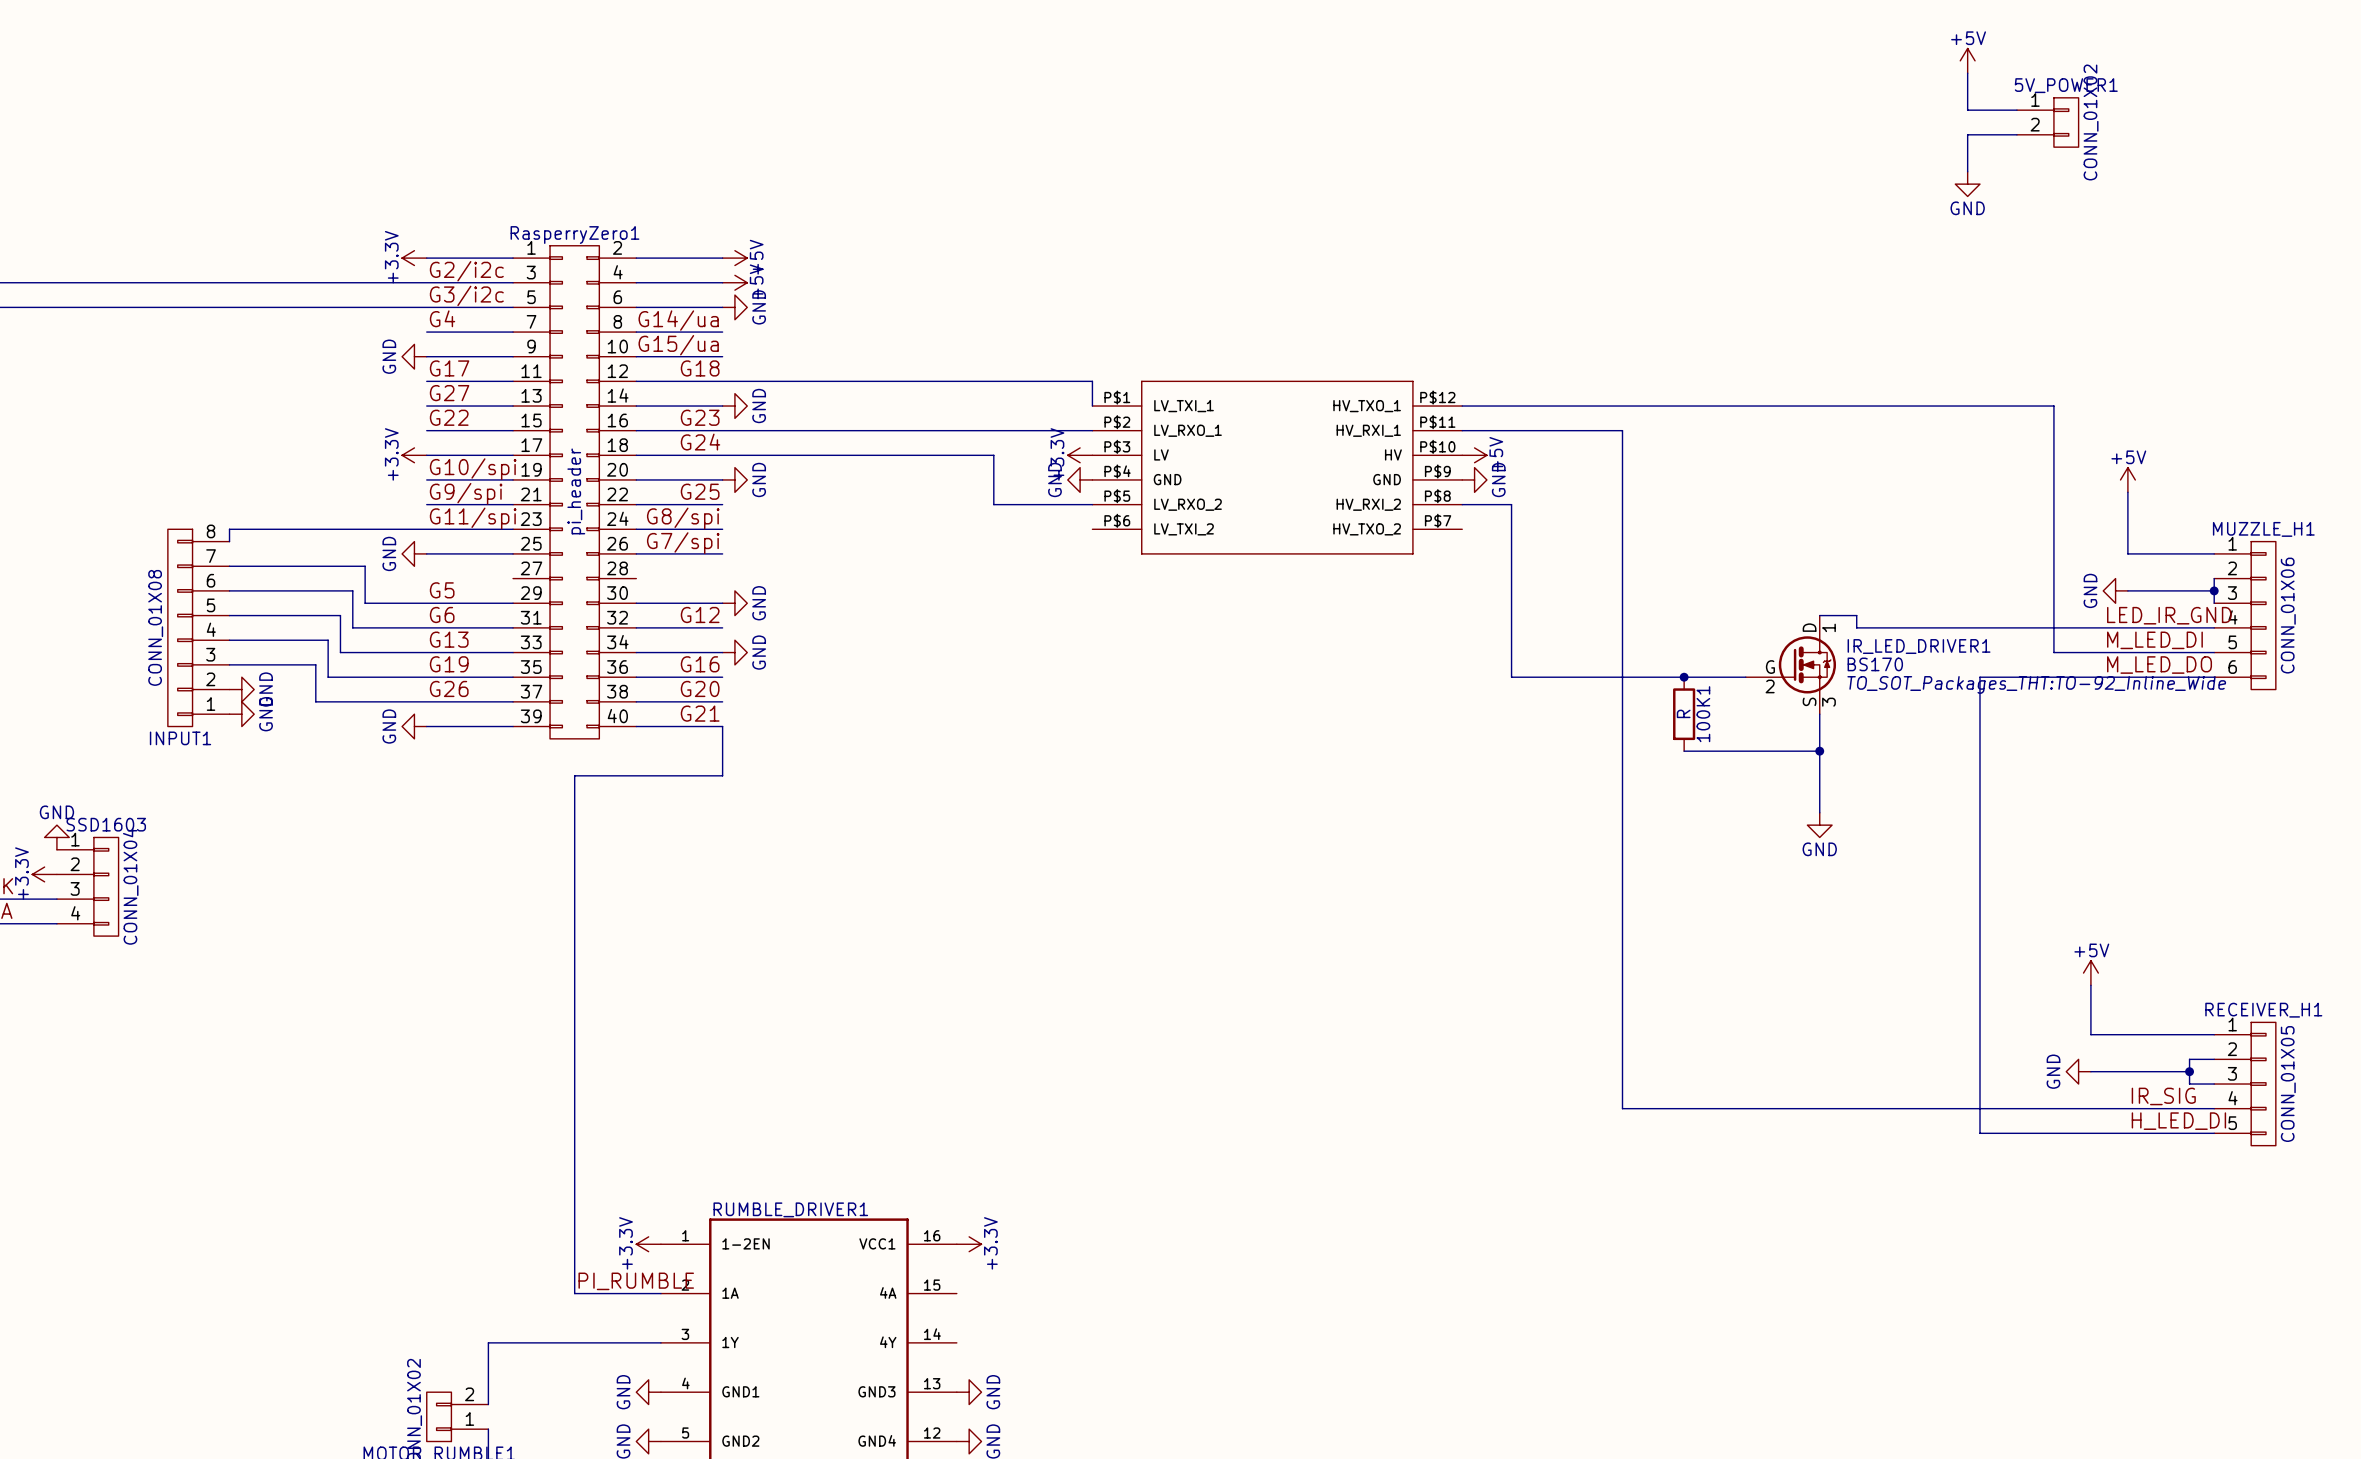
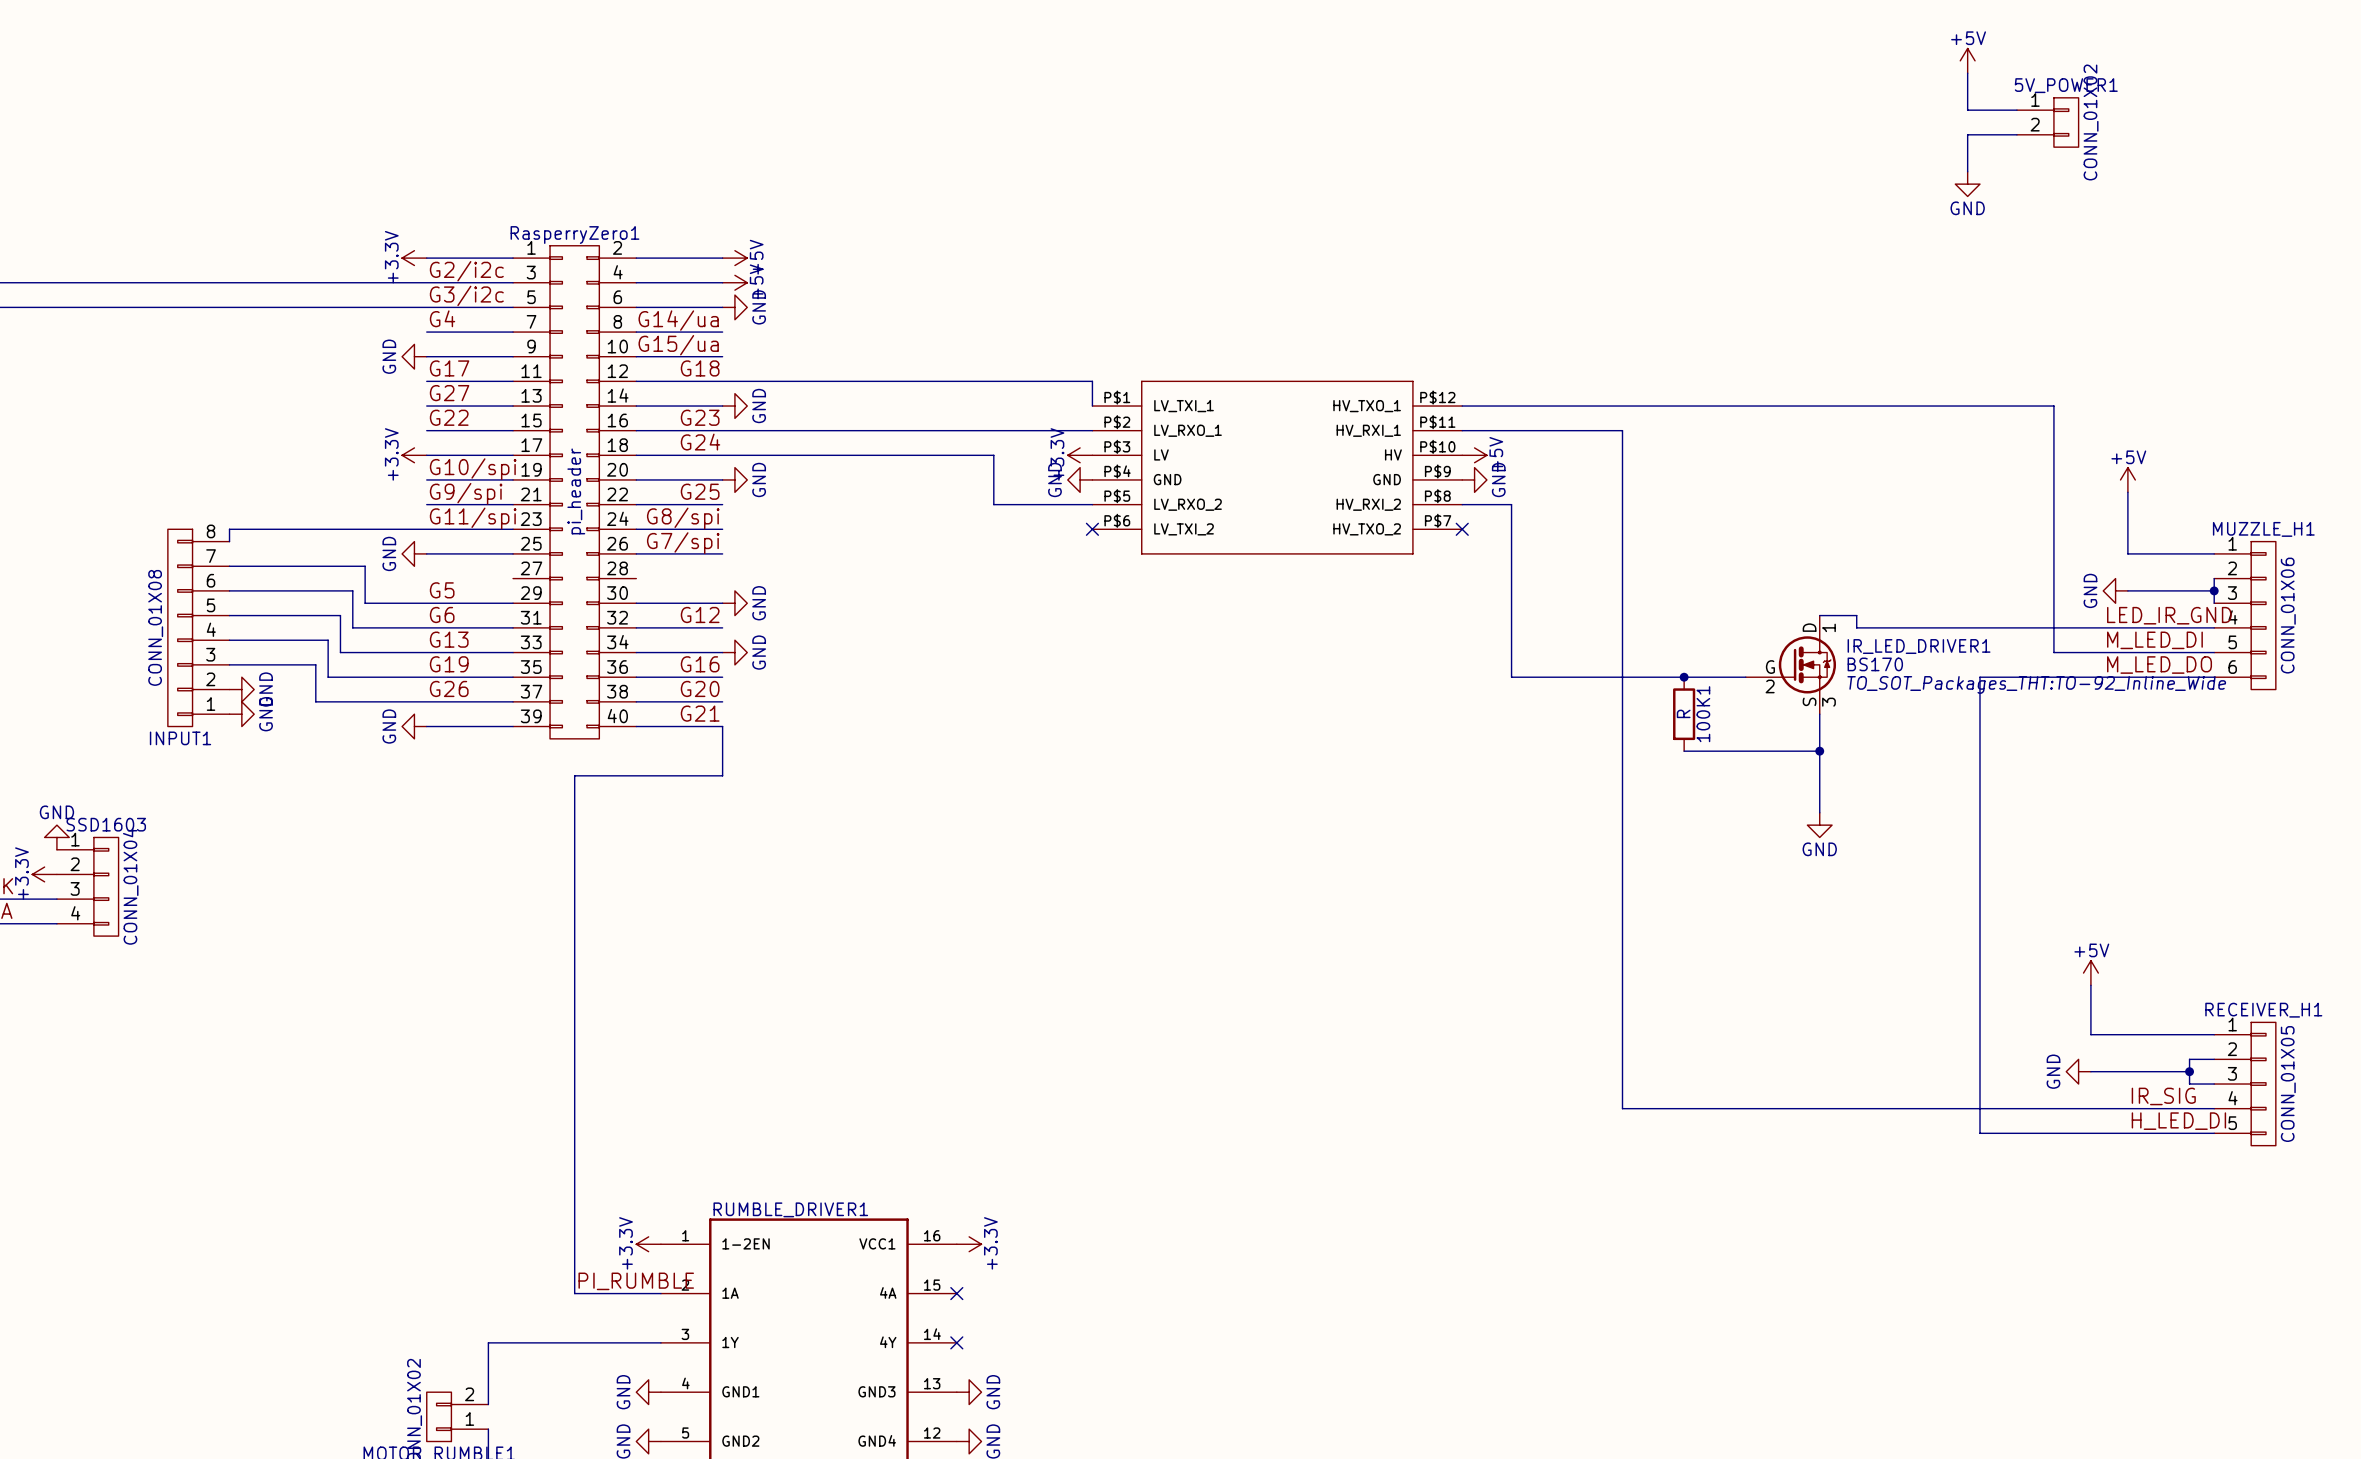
no-connect mark: none -> (1092, 529)
no-connect mark: none -> (1462, 529)
no-connect mark: none -> (956, 1293)
no-connect mark: none -> (956, 1342)

